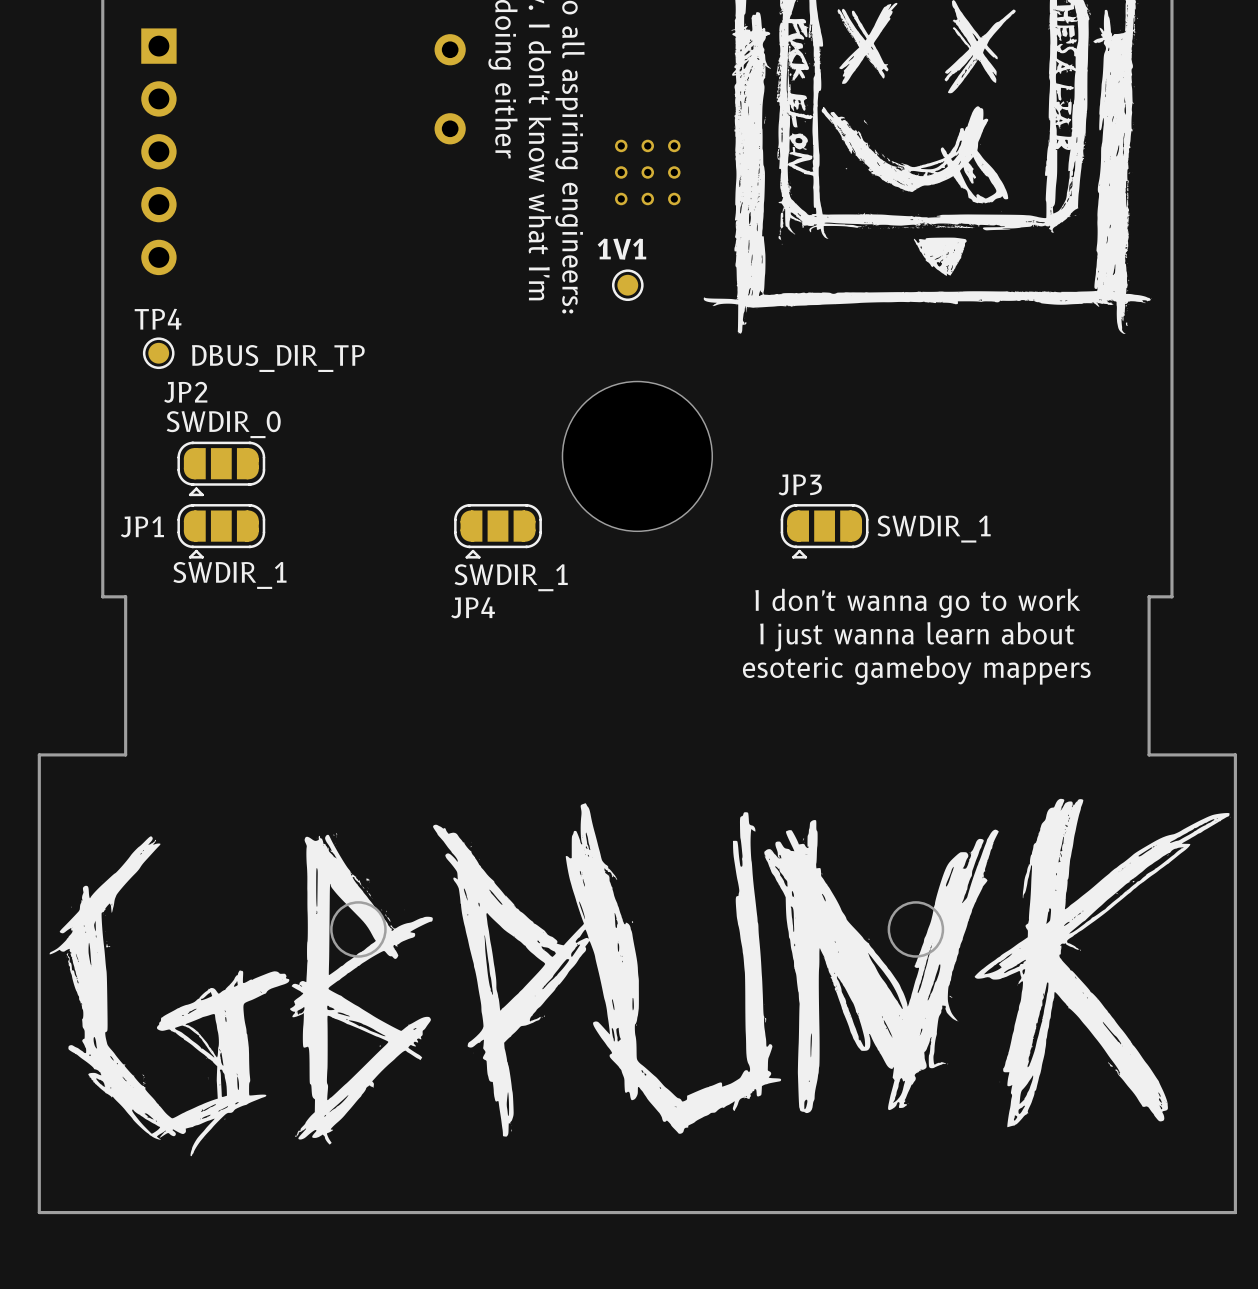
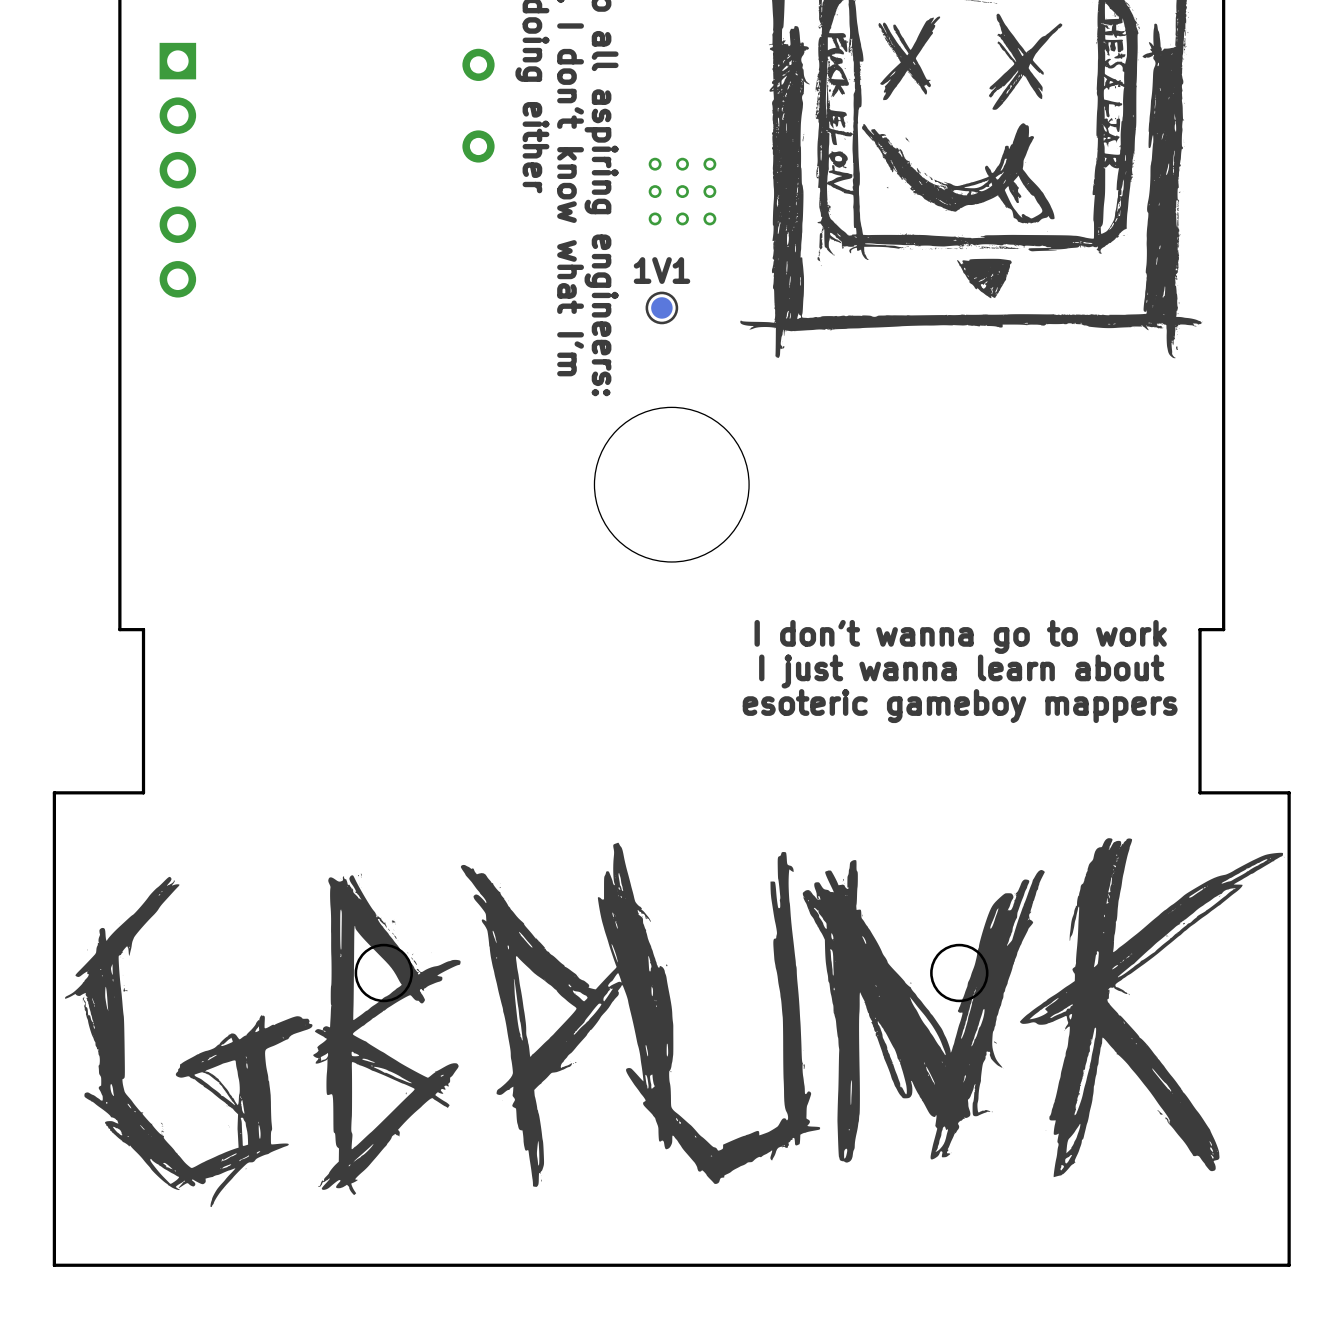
TP4: DBUS_DIR_TP (158, 353) -> none
JP2: SWDIR_0 (221, 468) -> none
JP1: SWDIR_1 (221, 531) -> none
JP4: SWDIR_1 (498, 531) -> none
JP3: SWDIR_1 (824, 531) -> none

